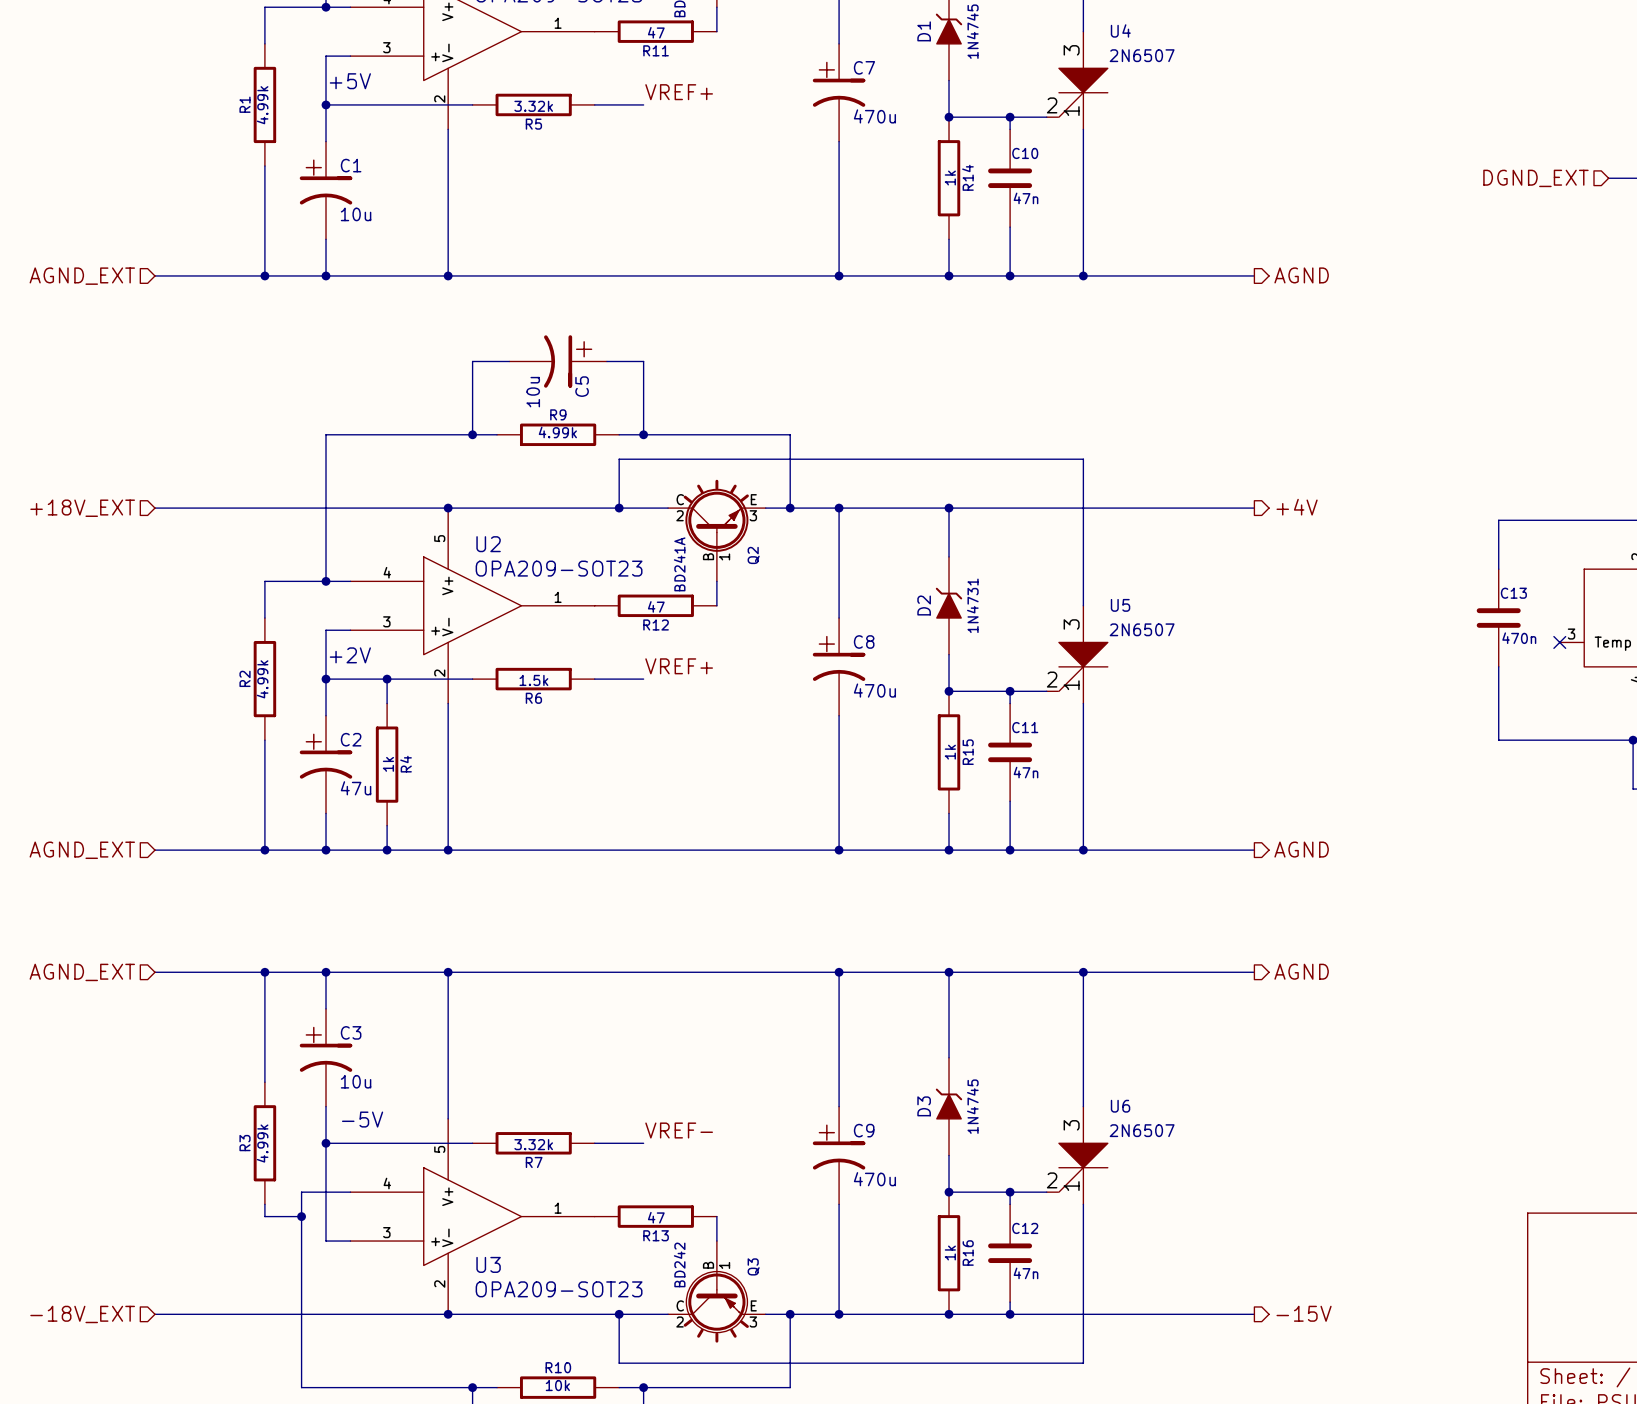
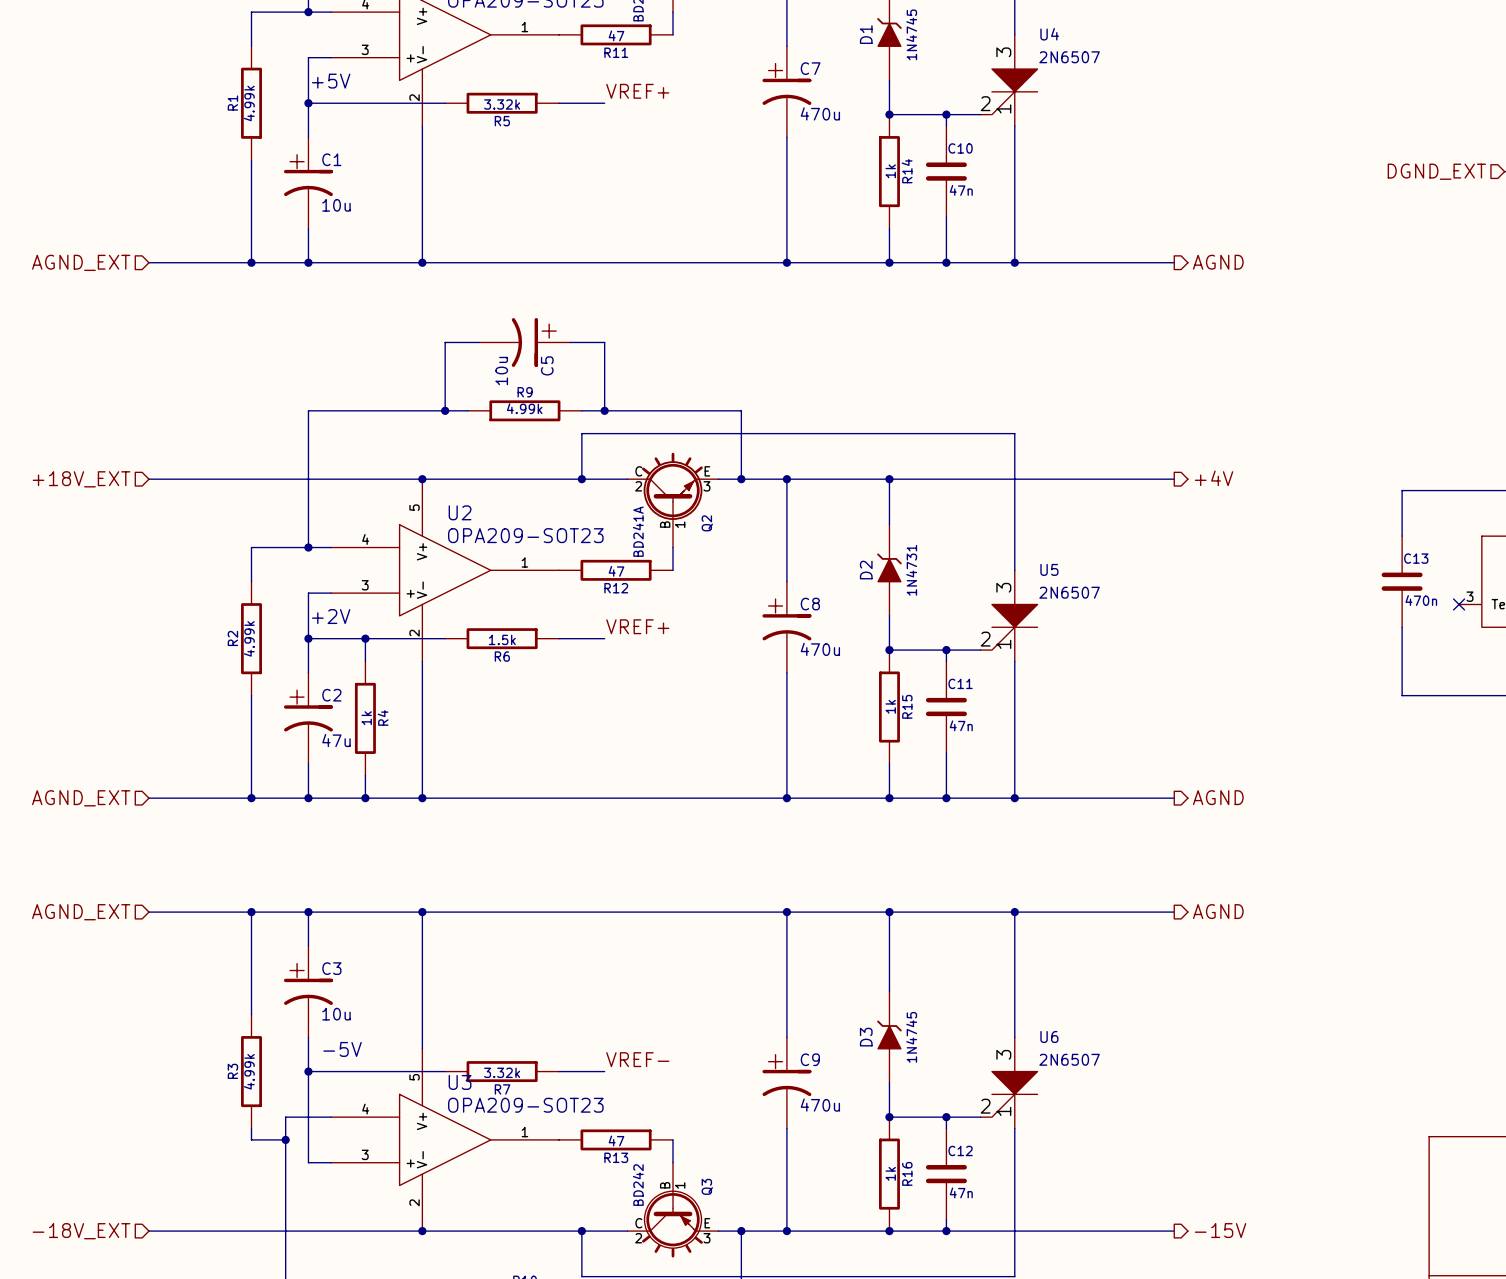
U3 name position: U3 (488, 1264) -> U3 (460, 1082)
U3 value position: OPA209-SOT23 (559, 1289) -> OPA209-SOT23 (525, 1105)

